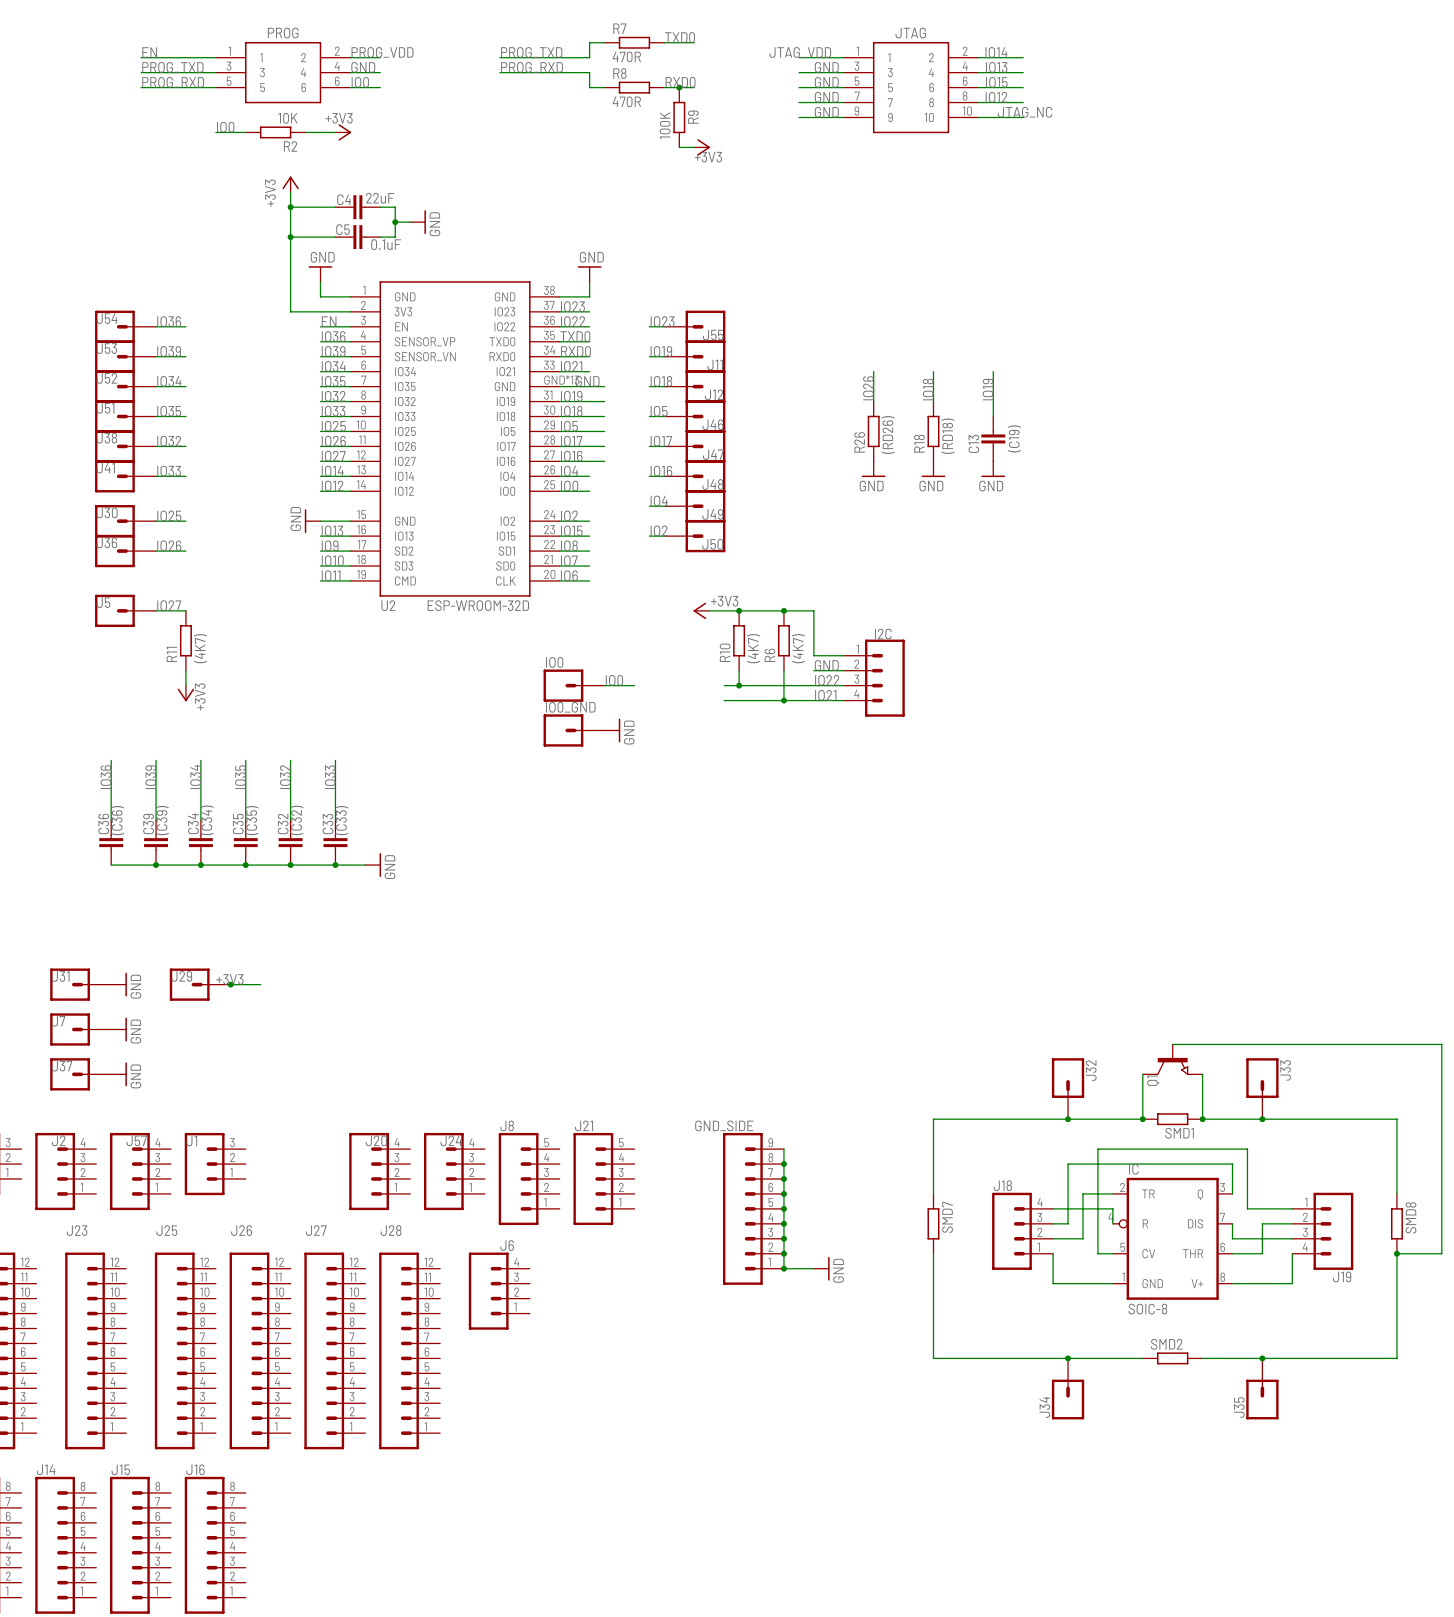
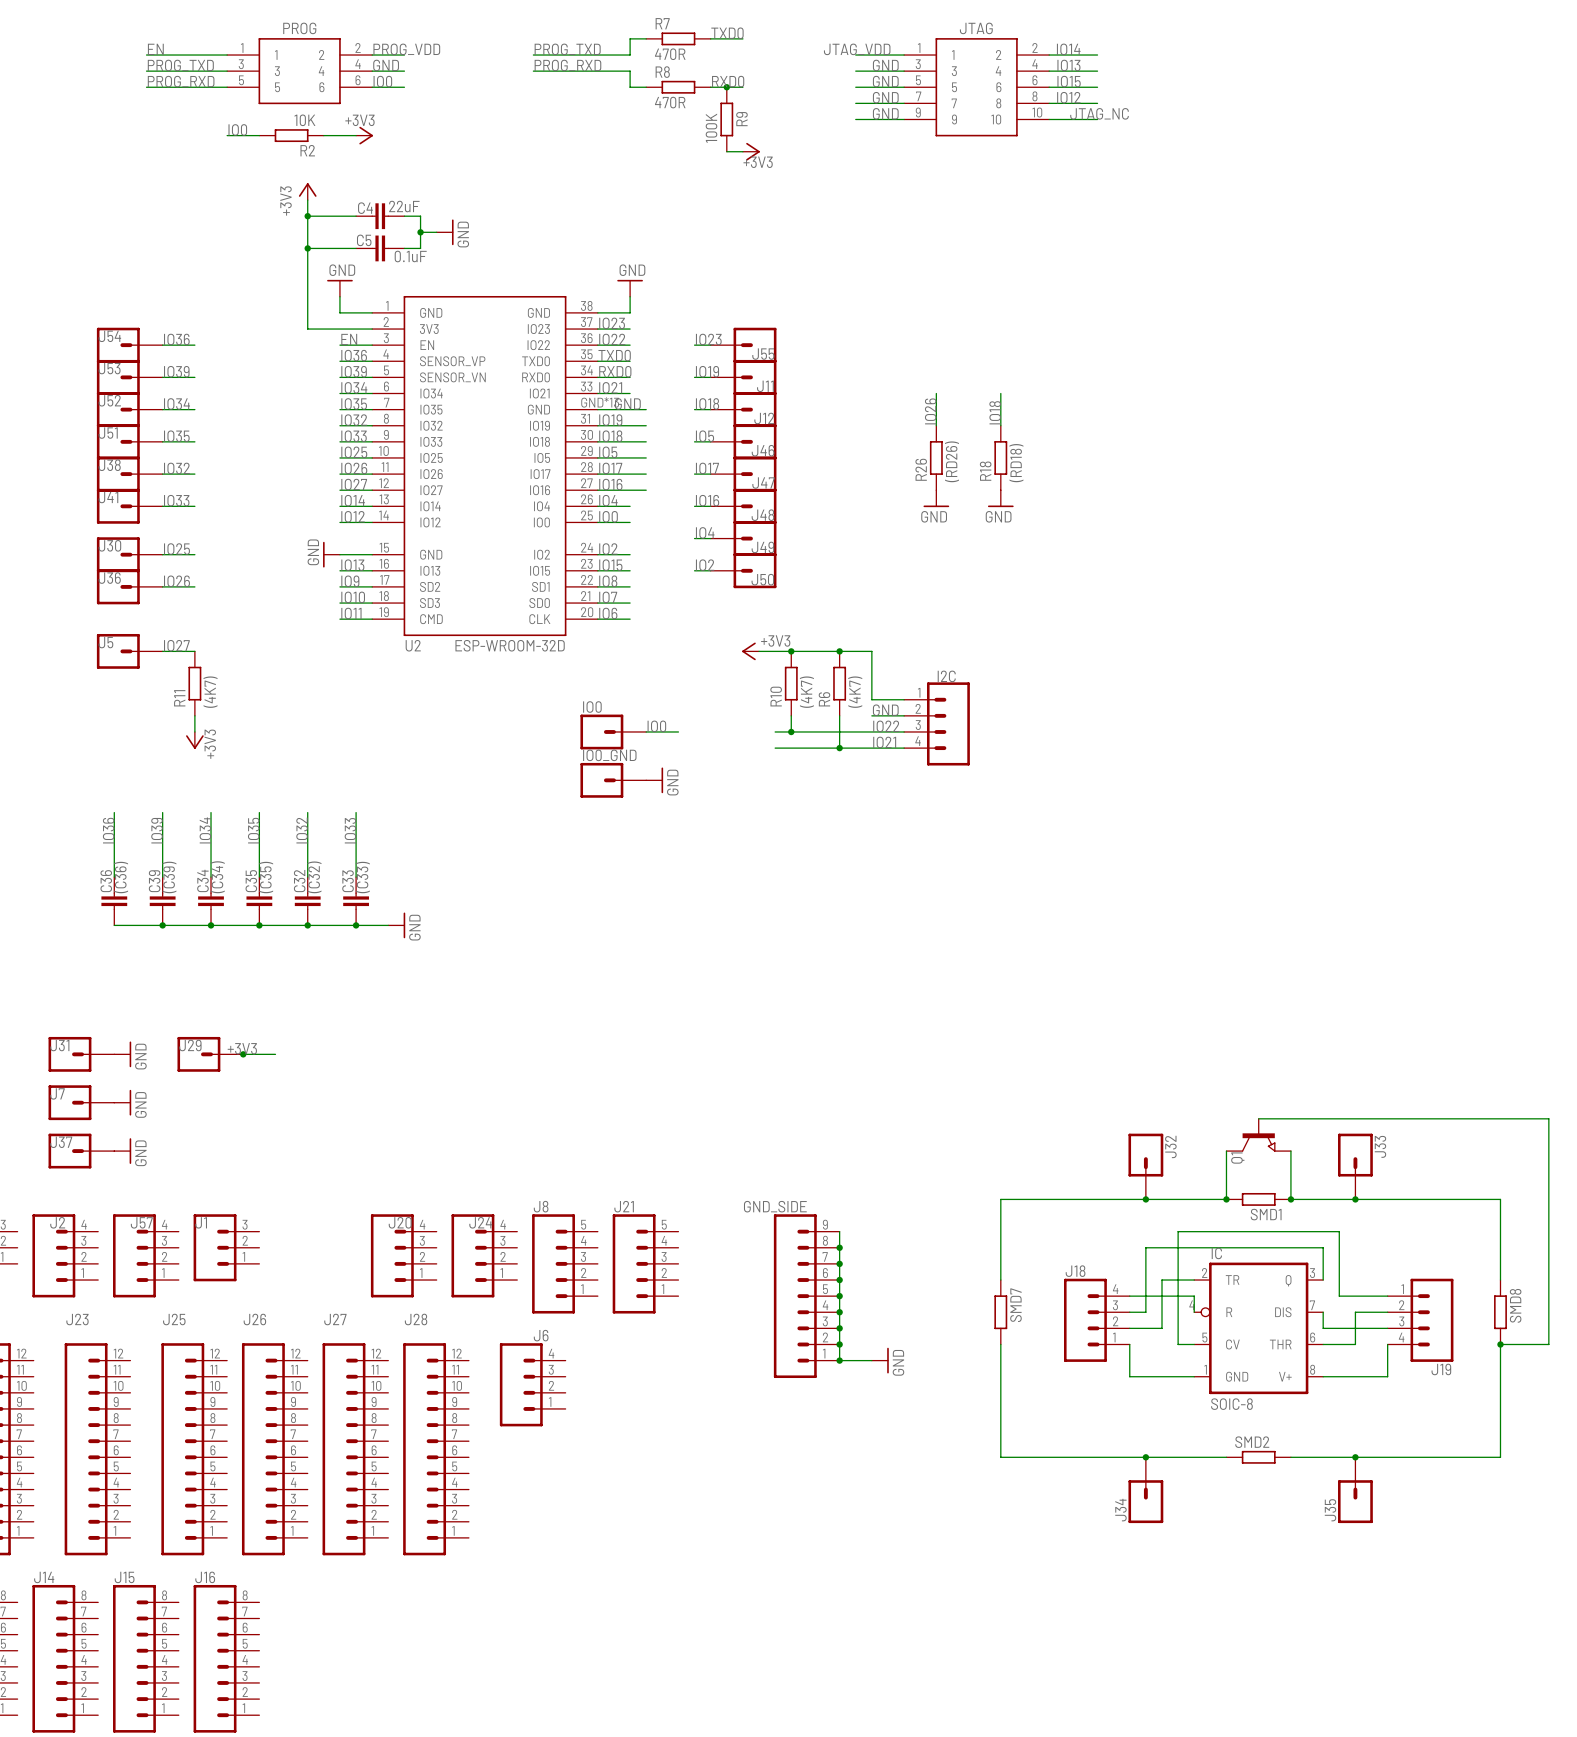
wire: (993, 371) (993, 416) -> none
label: IO19 (988, 389) -> none
C13: (C19) (993, 438) -> none
power symbol: GND (993, 469) -> none

